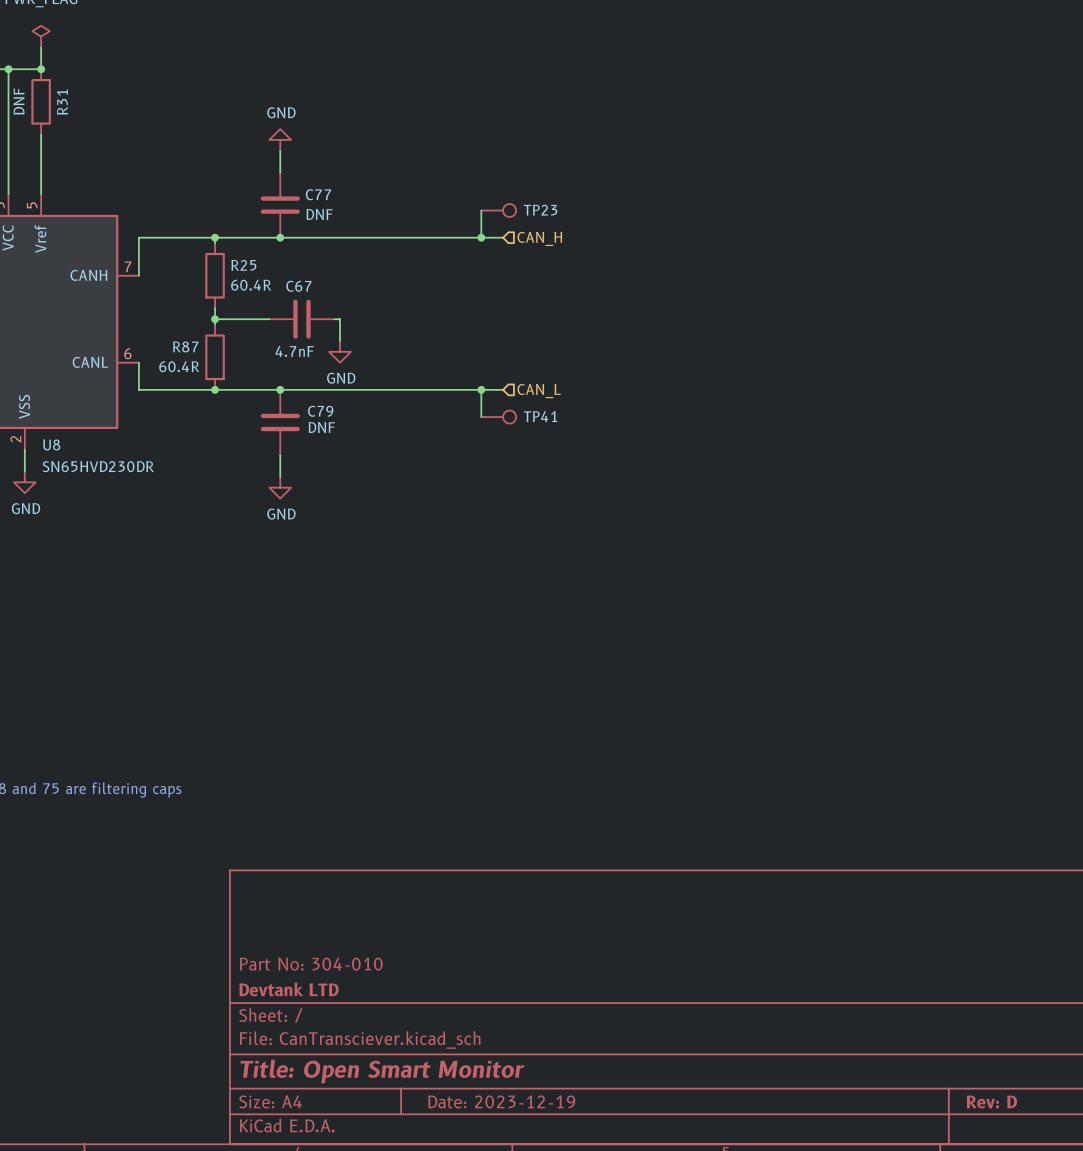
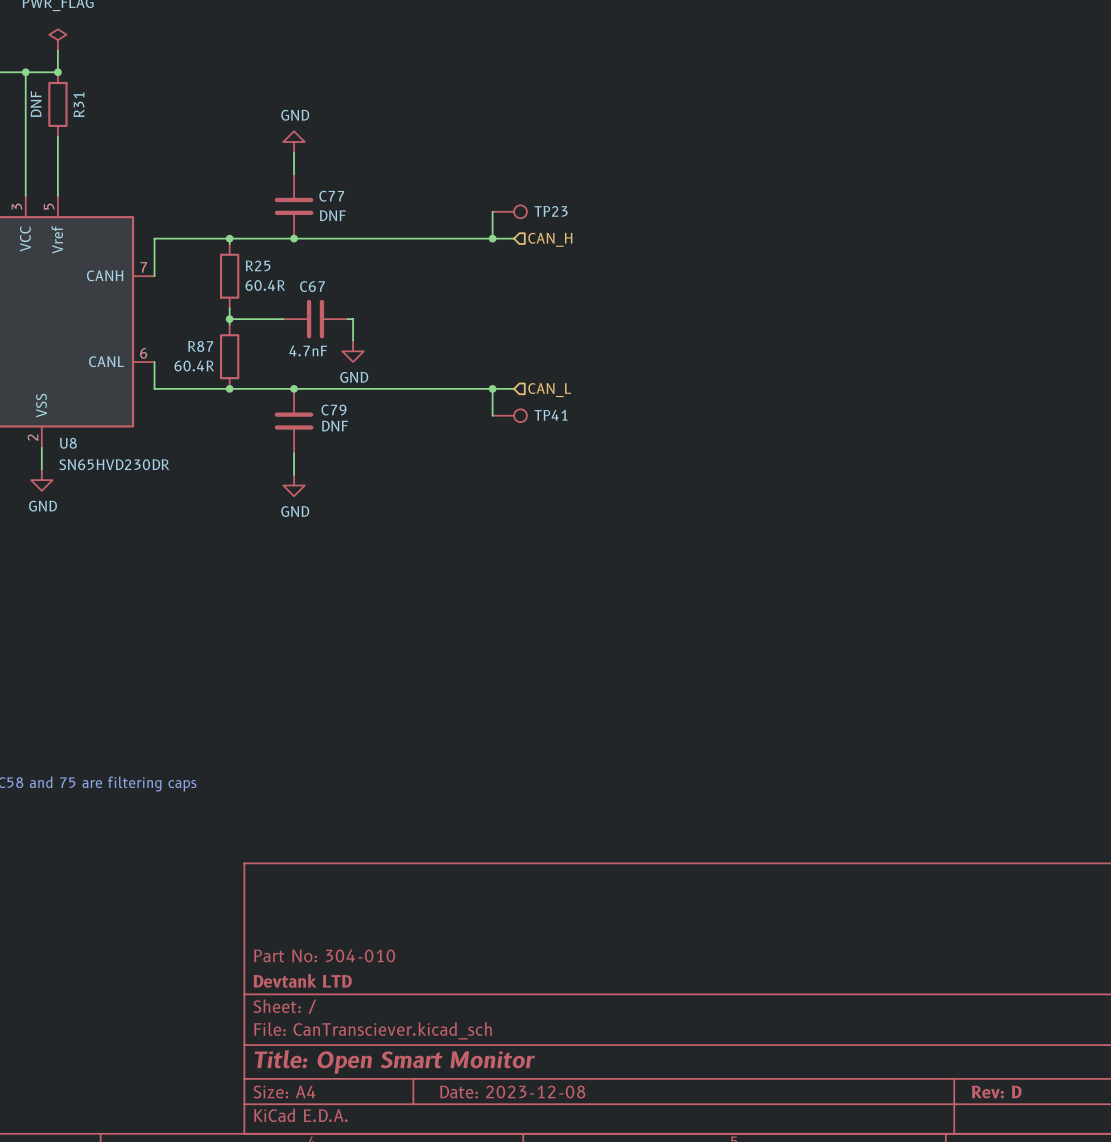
title block: Date: 2023-12-19 (501, 1101) -> Date: 2023-12-08 (512, 1092)

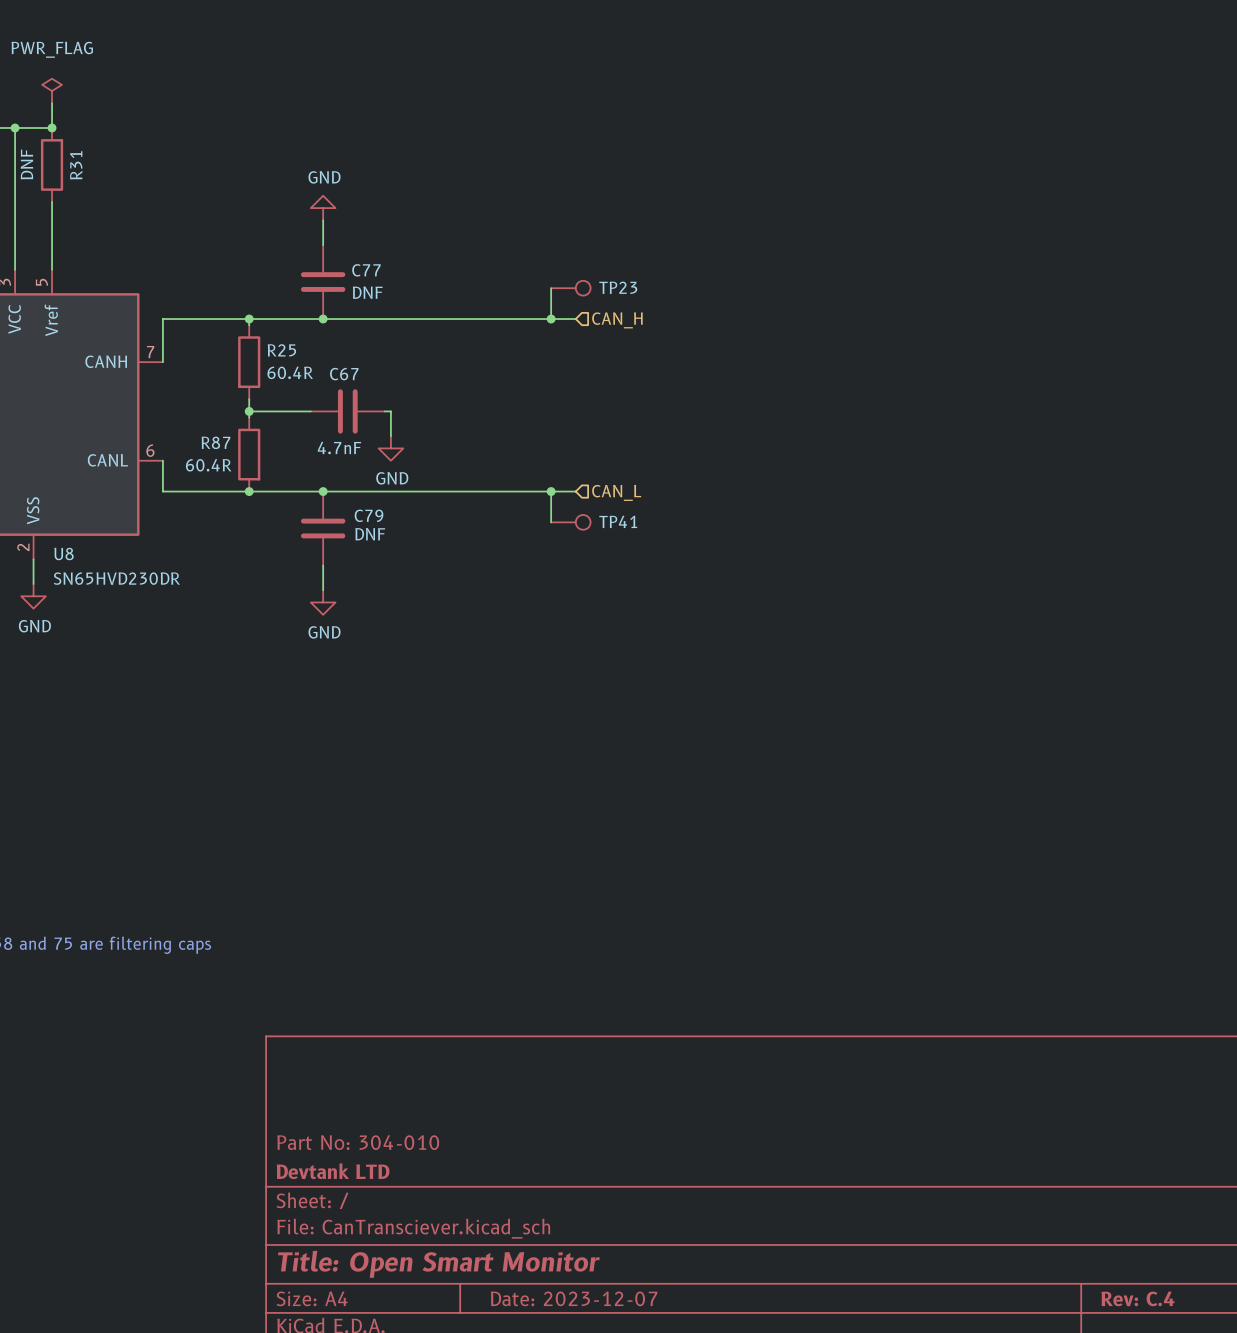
title block: Date: 2023-12-08 (512, 1092) -> Date: 2023-12-07 (574, 1298)
title block: Rev: D (996, 1092) -> Rev: C.4 (1138, 1298)

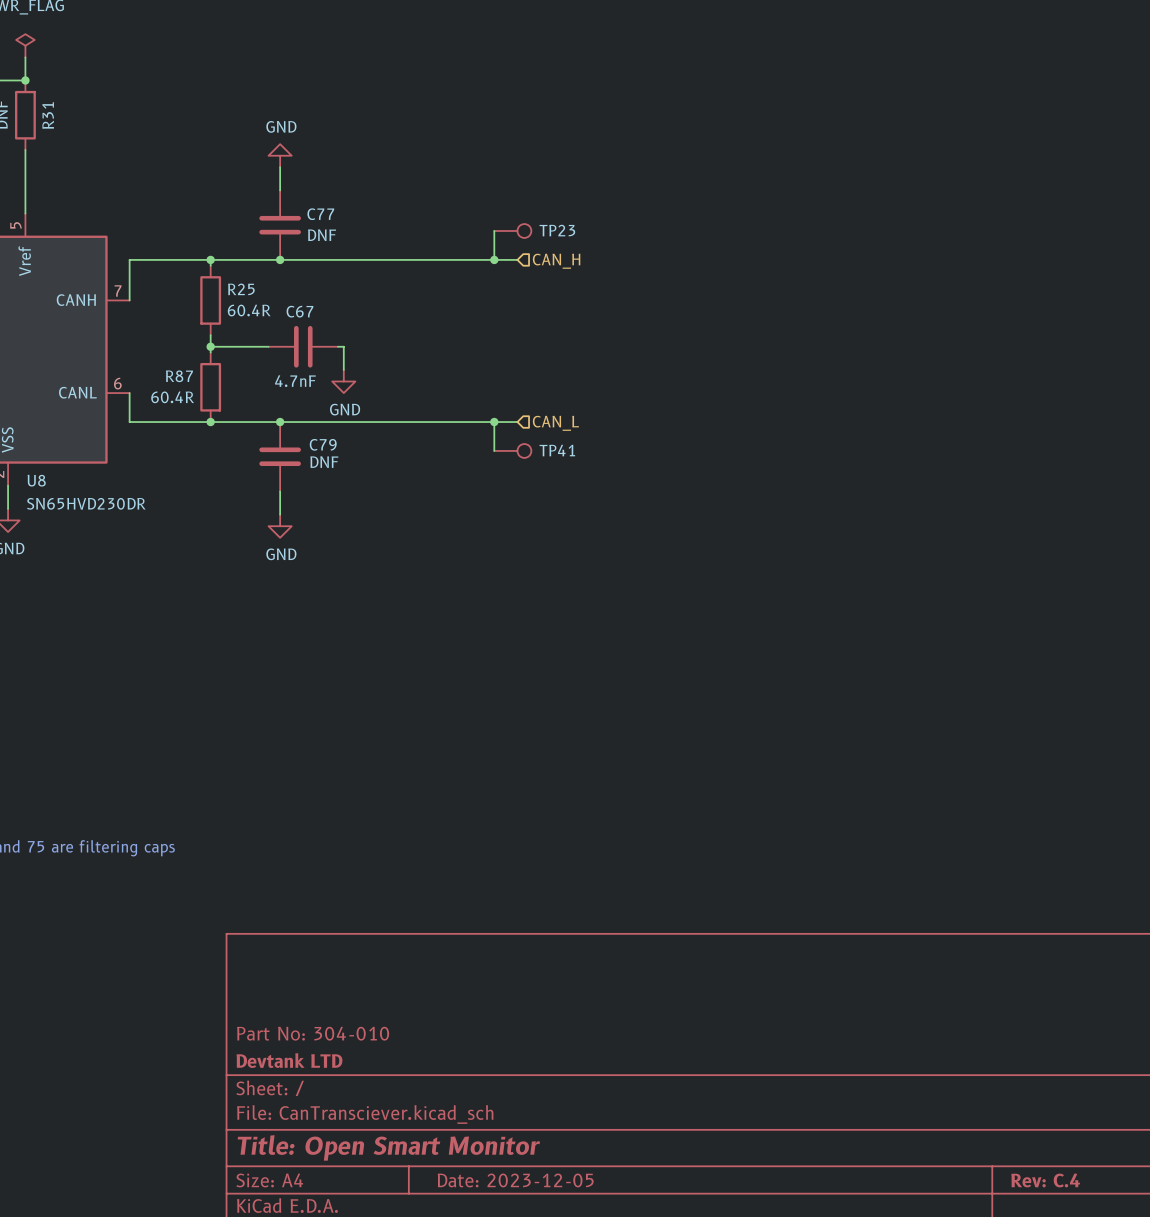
title block: Date: 2023-12-07 (574, 1298) -> Date: 2023-12-05 (515, 1180)

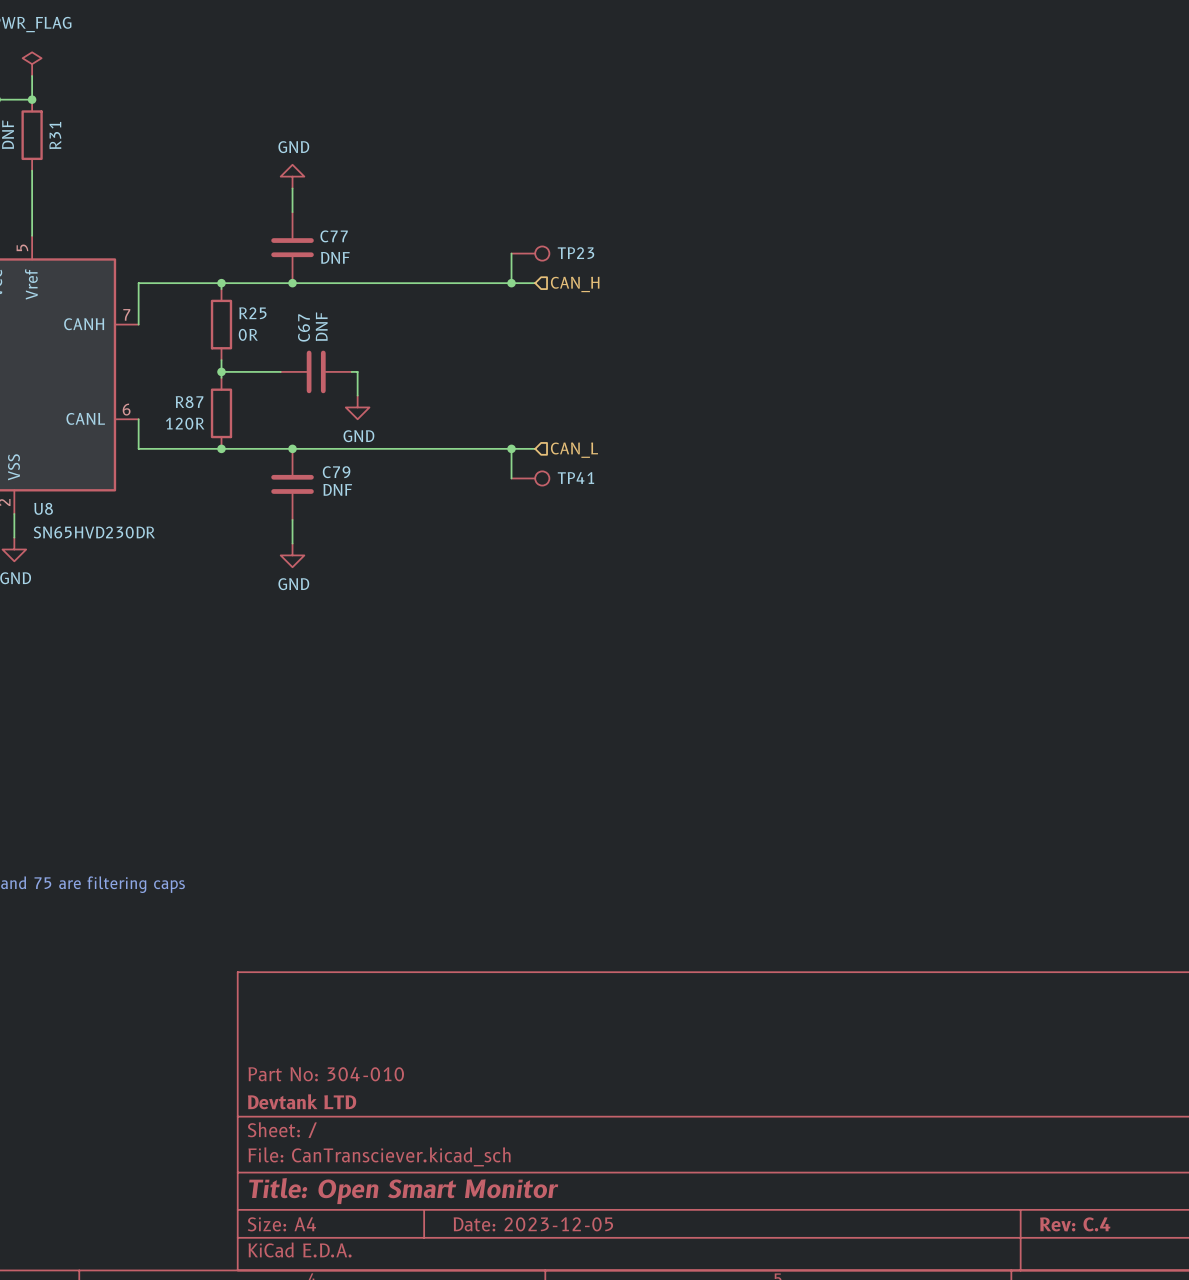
R25 value: 60.4R (249, 310) -> 0R (248, 334)
C67 name rotation: 0° (299, 311) -> 90° counterclockwise (304, 327)
C67 value: 4.7nF (295, 381) -> DNF (321, 326)
R87 value: 60.4R (172, 397) -> 120R (185, 423)

